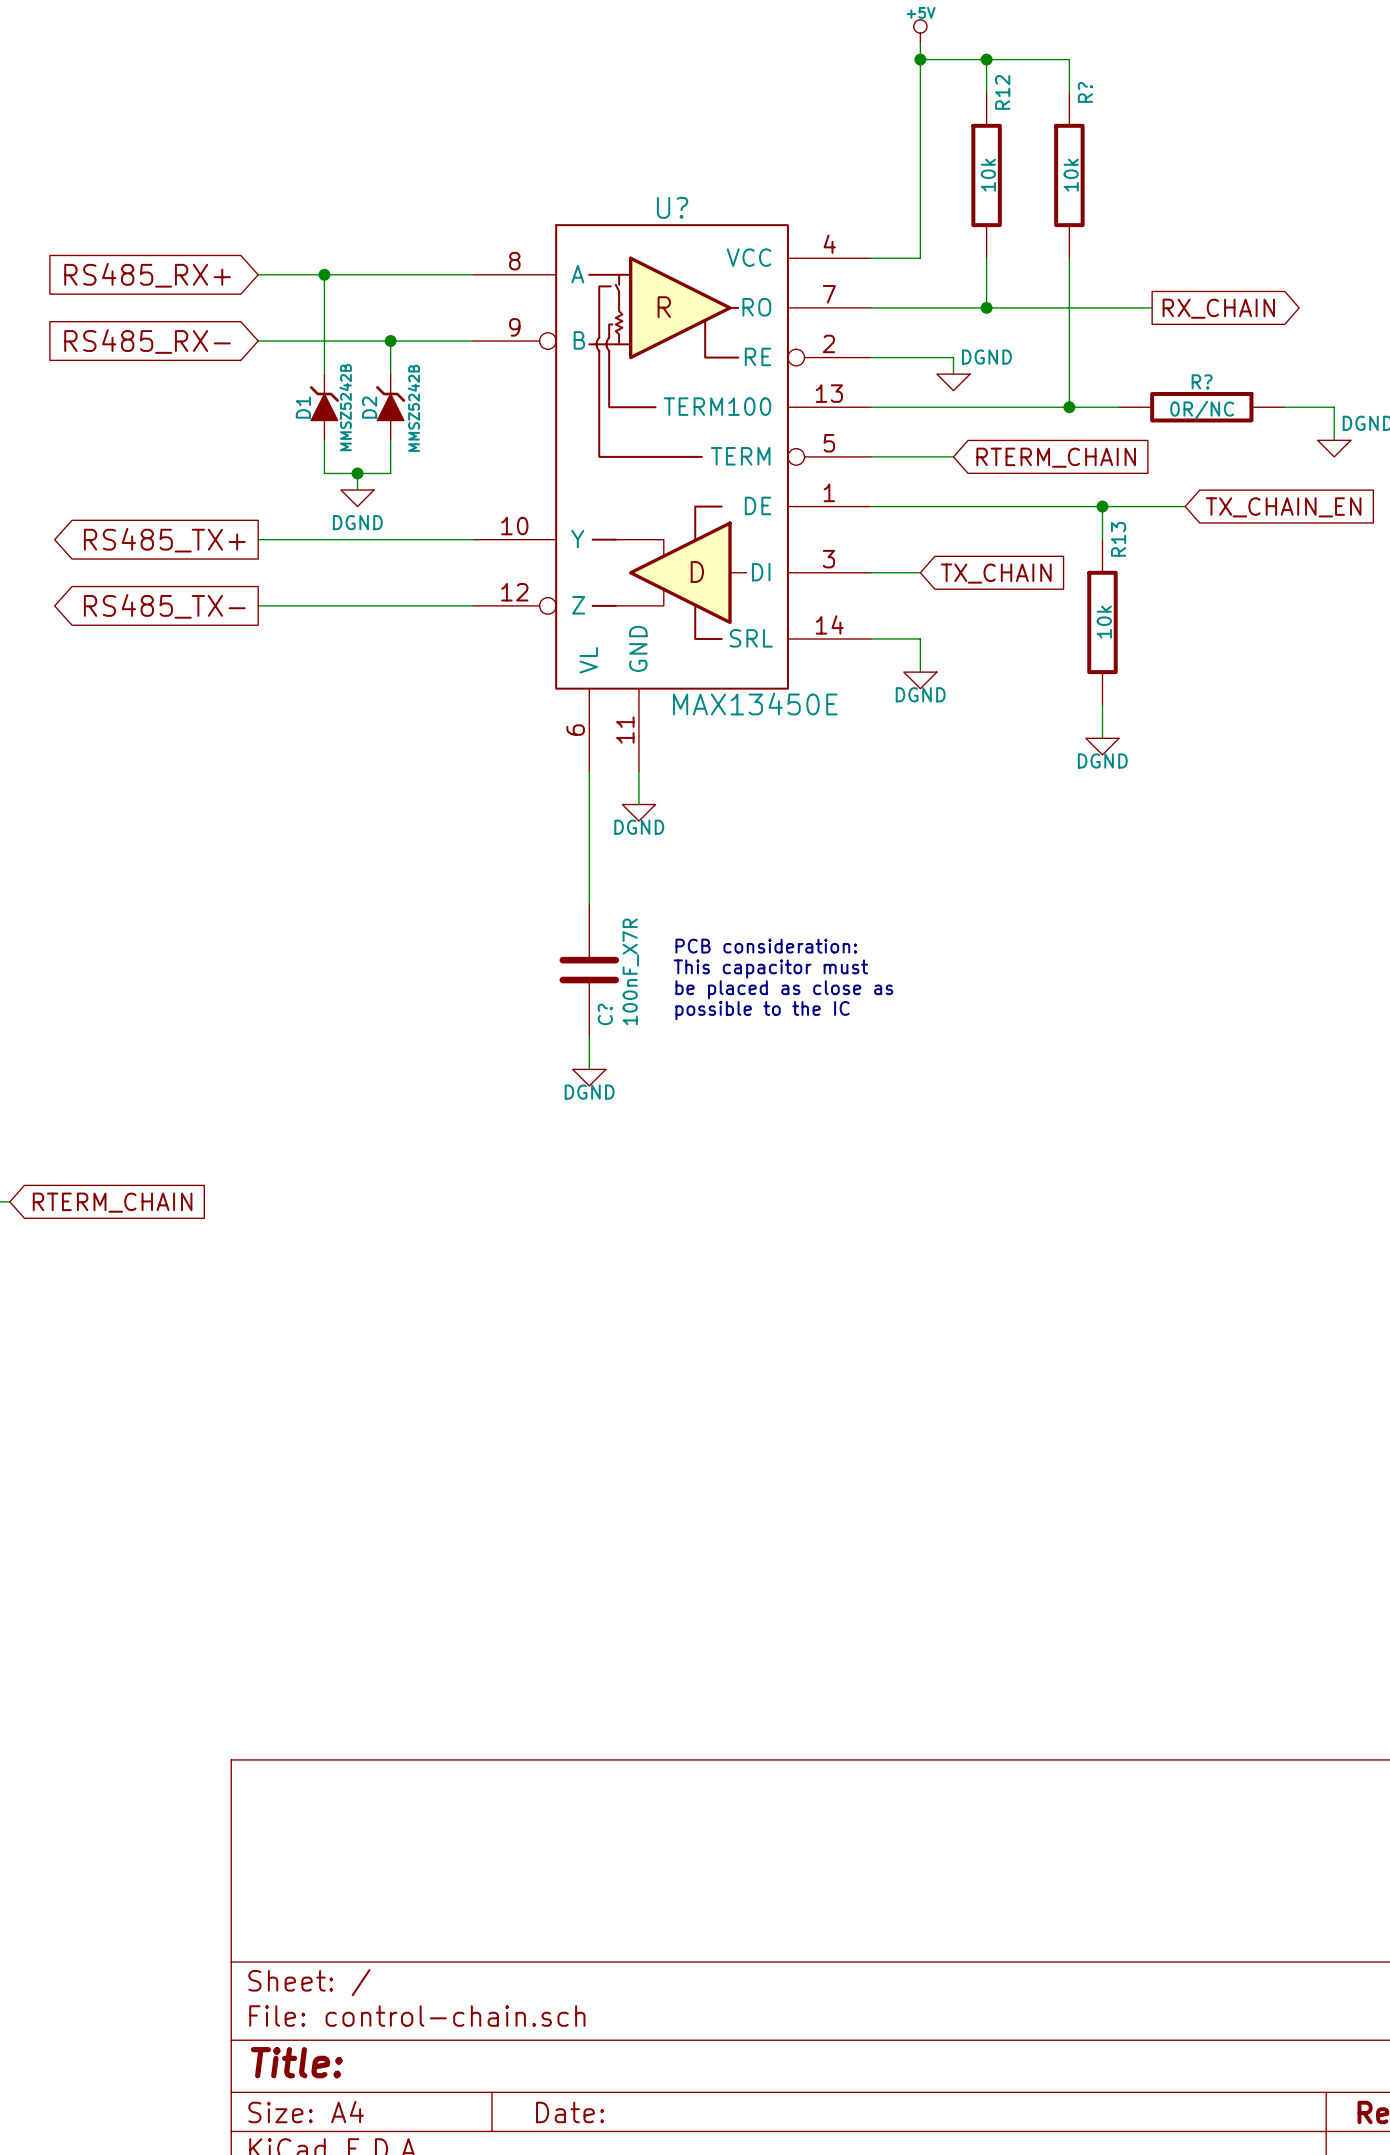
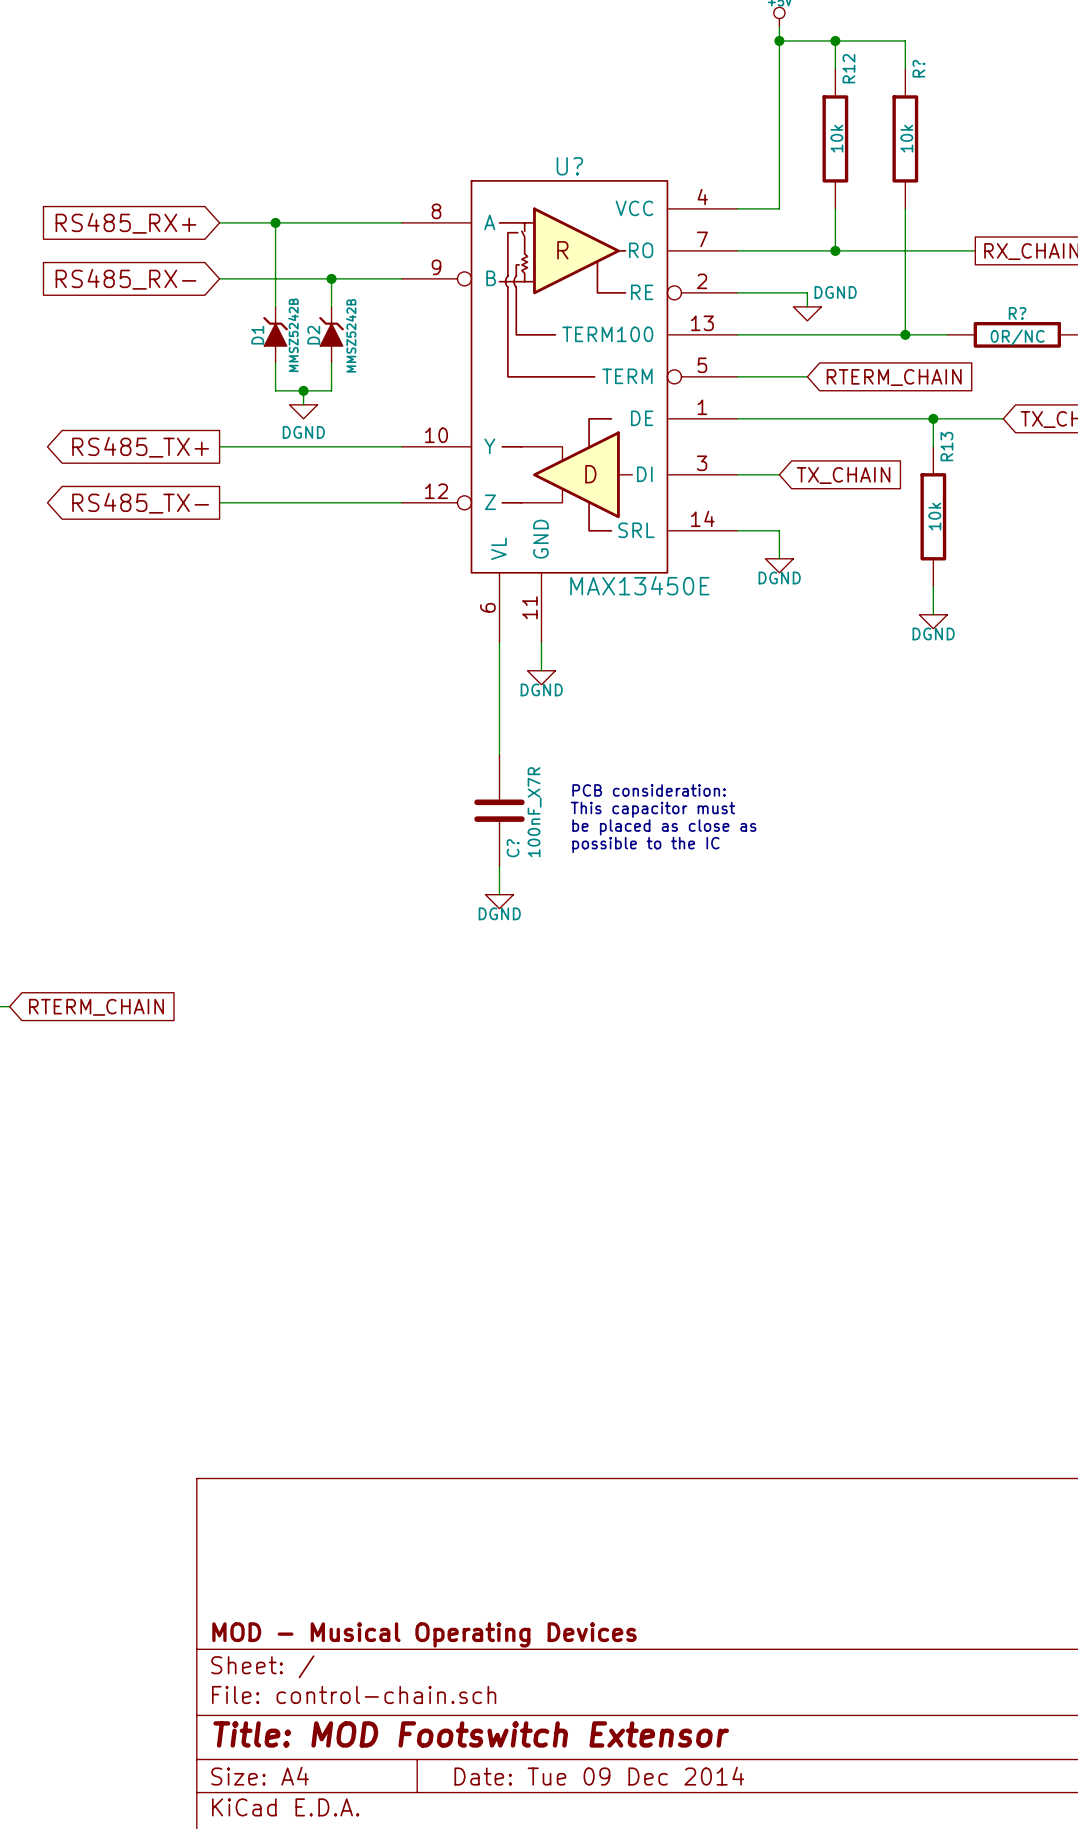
title block: none -> MOD - Musical Operating Devices (424, 1634)
title block: Title: (296, 2062) -> Title: MOD Footswitch Extensor (471, 1734)
title block: Date: (570, 2112) -> Date: Tue 09 Dec 2014 (599, 1776)

